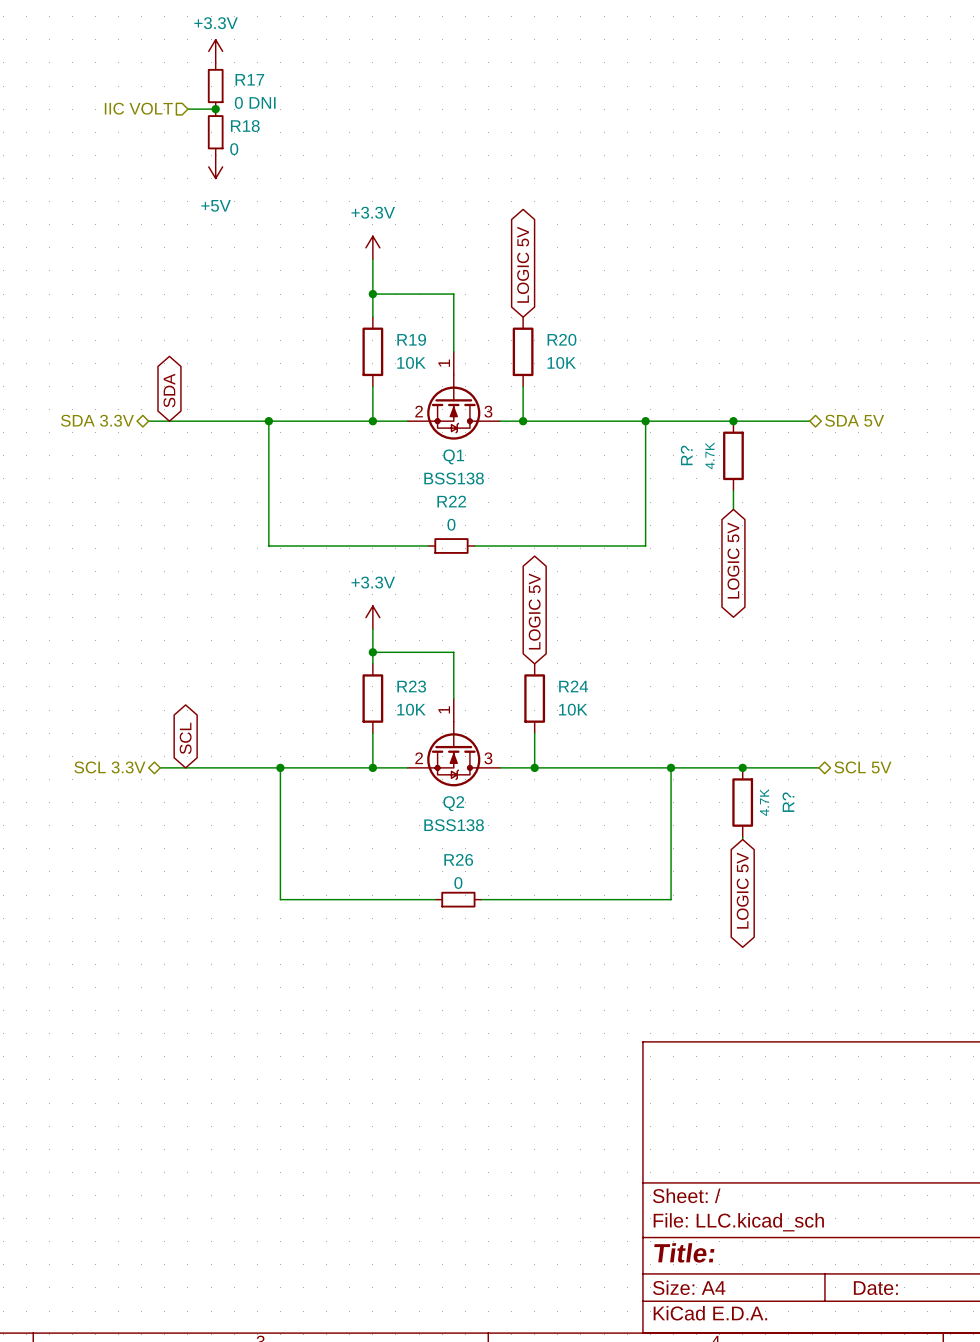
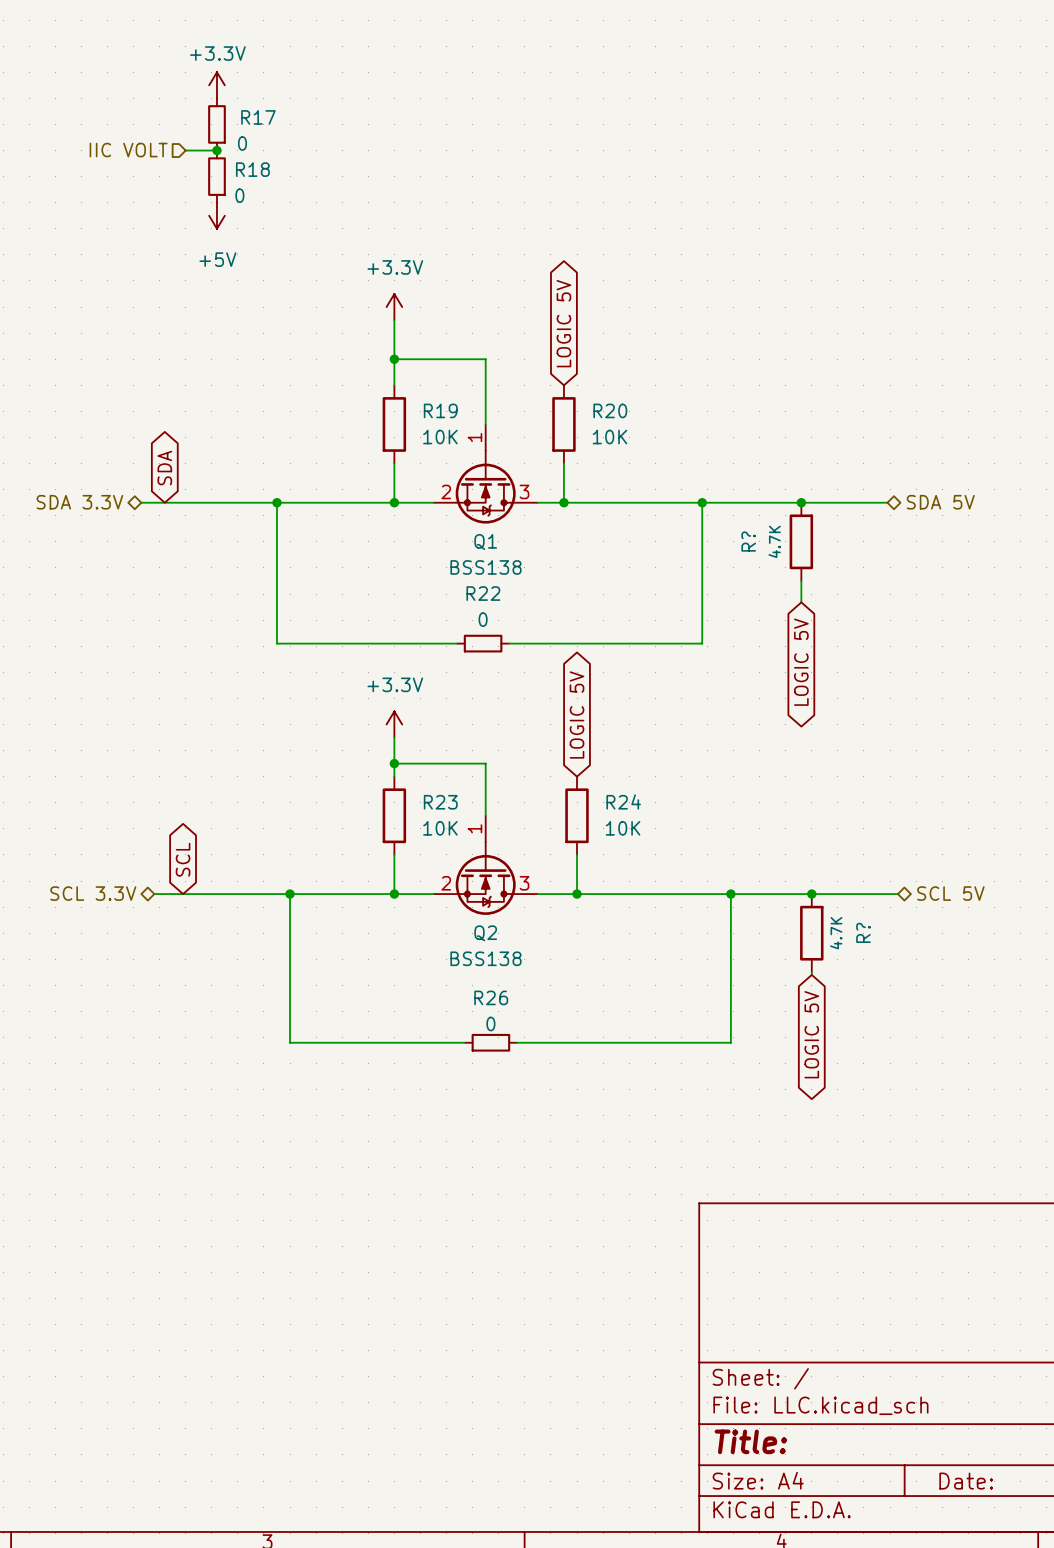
R17 value: 0 DNI (255, 102) -> 0 (242, 143)

